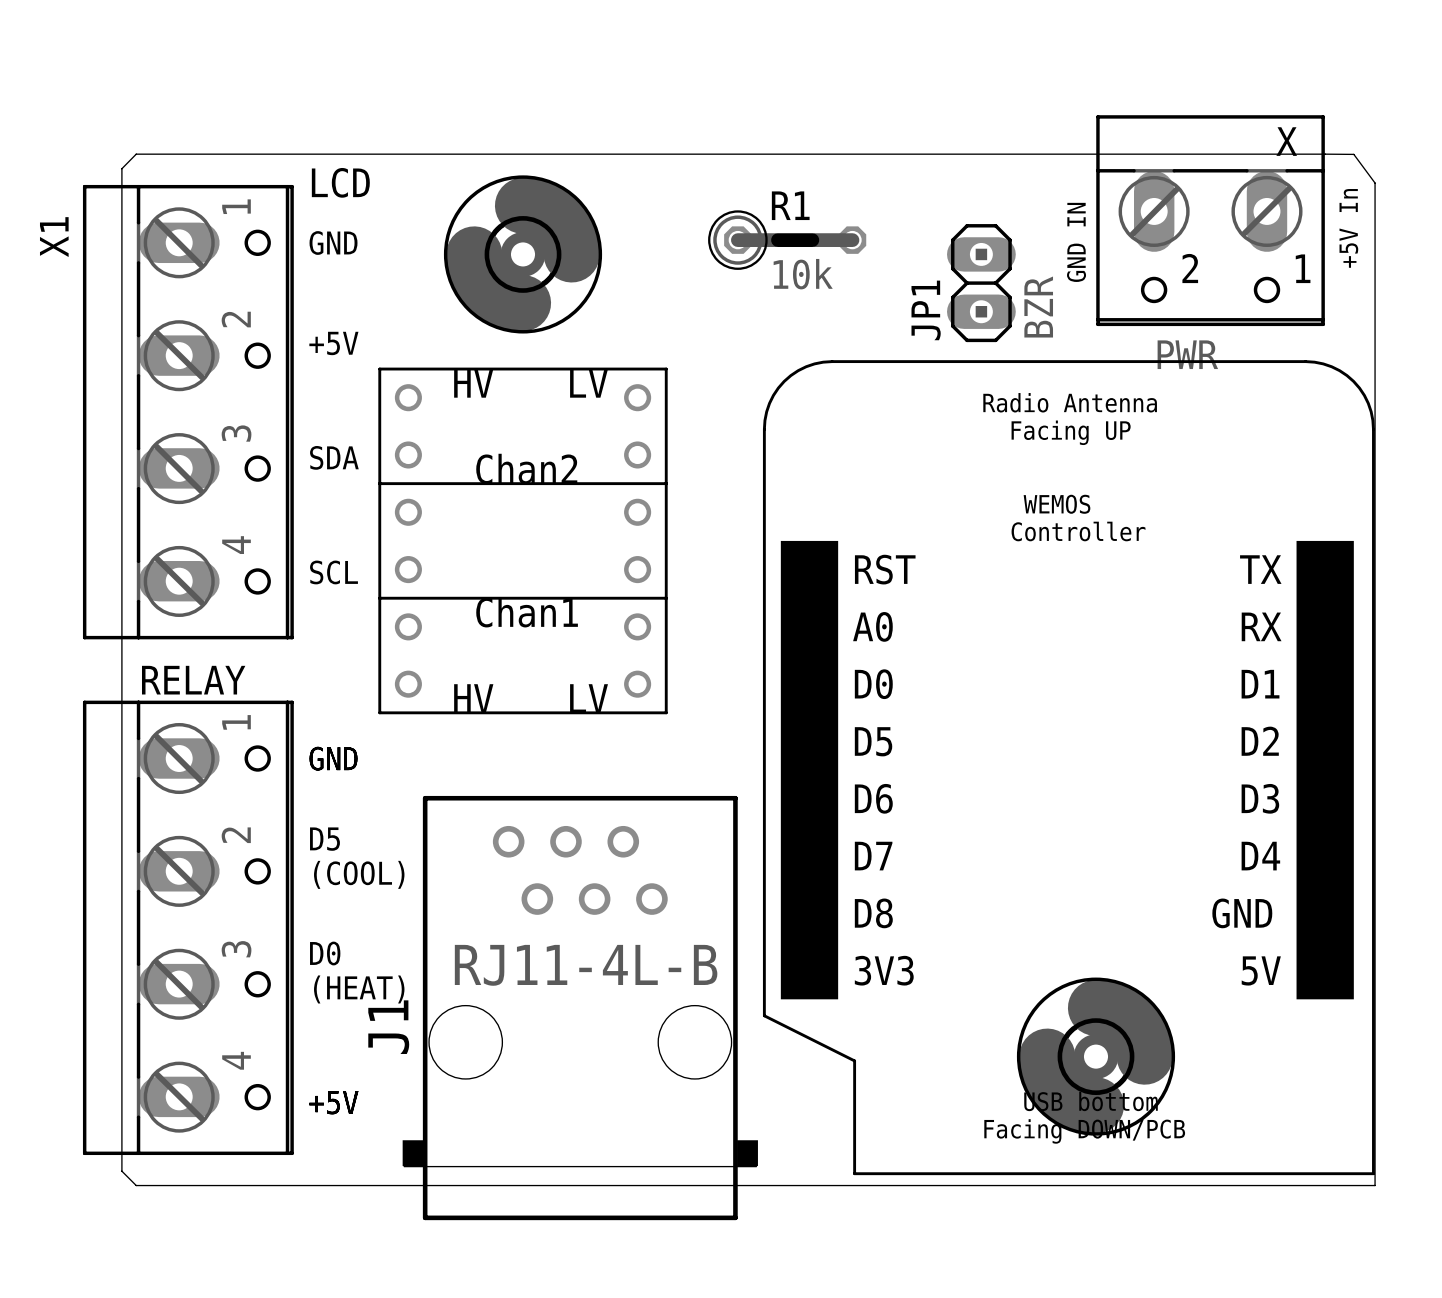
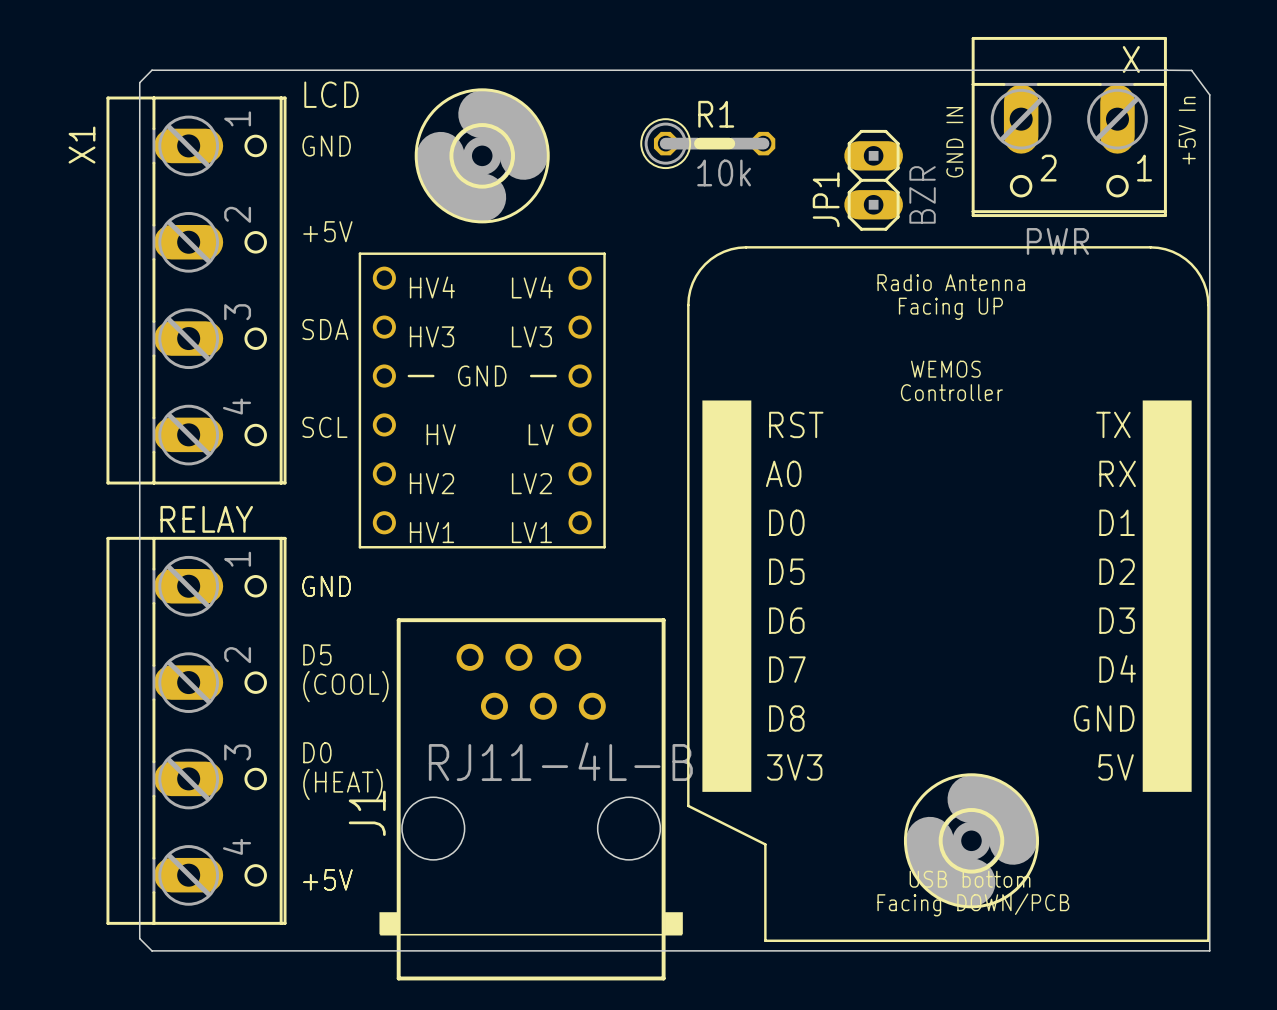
part footprint: [378, 367, 668, 715] -> [358, 252, 606, 549]

